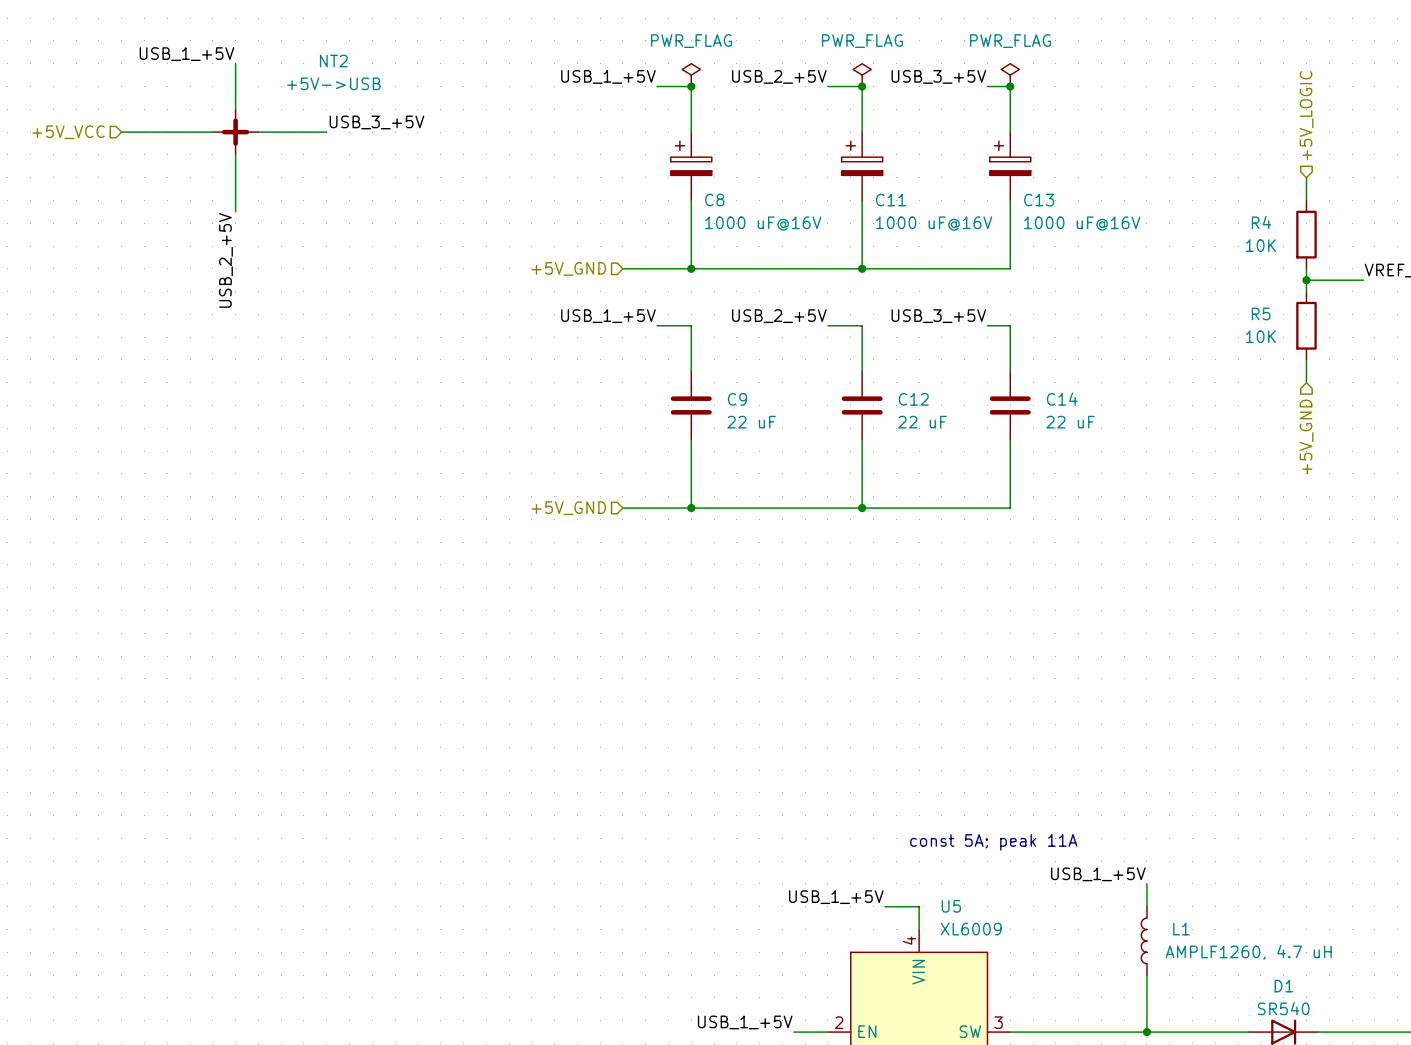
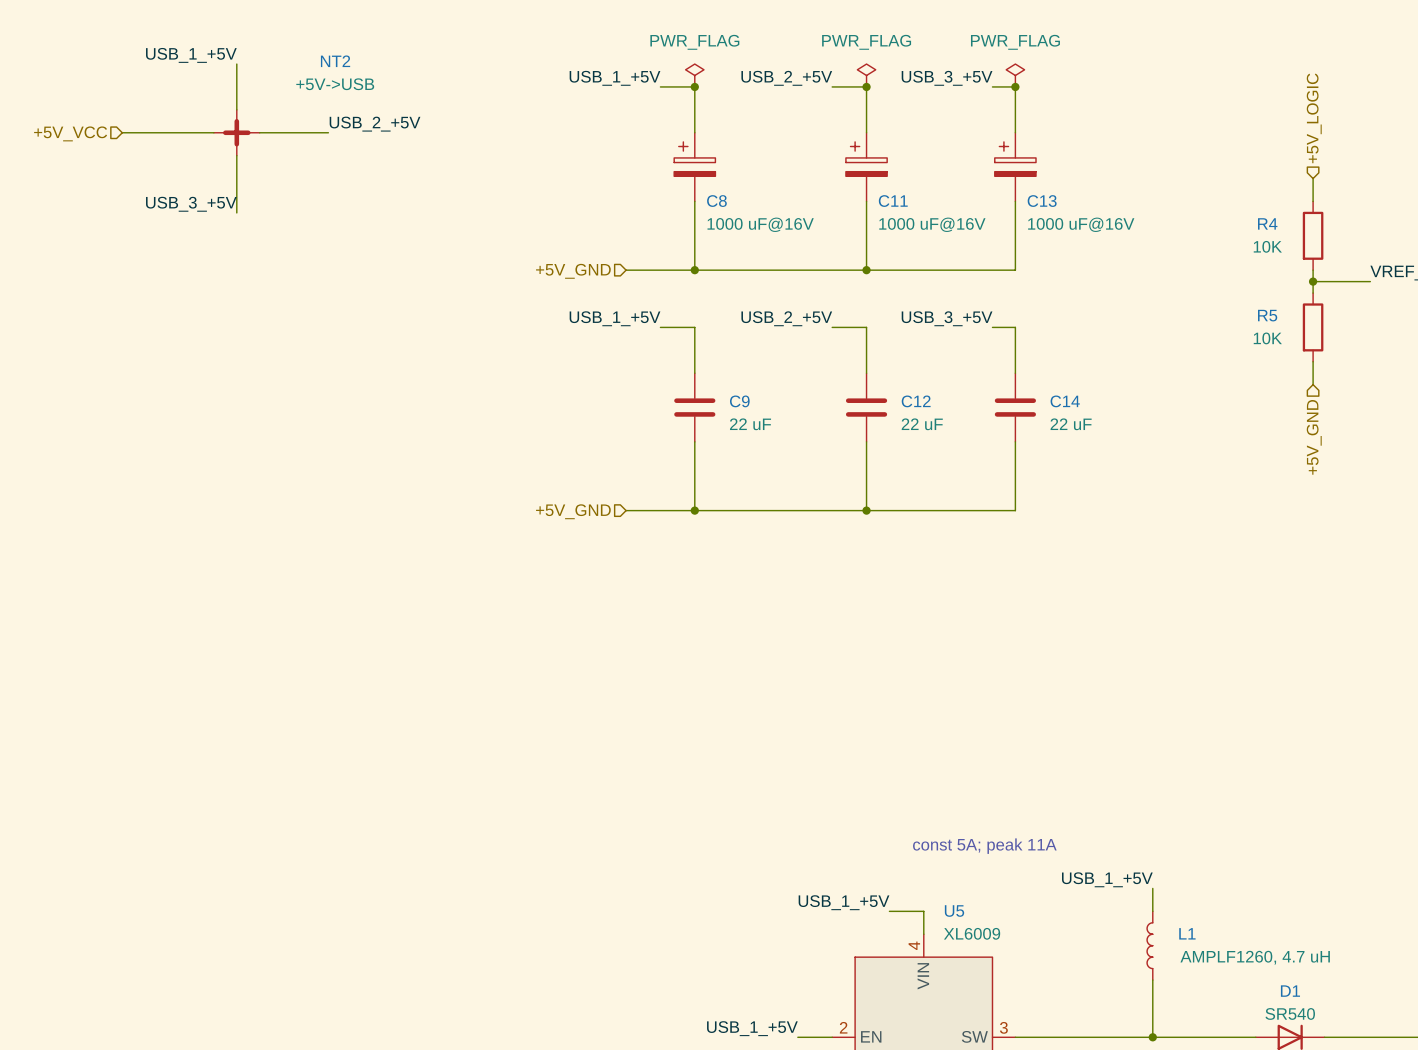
label: USB_3_+5V (377, 122) -> USB_2_+5V (375, 124)
label: USB_2_+5V (225, 260) -> USB_3_+5V (191, 204)

